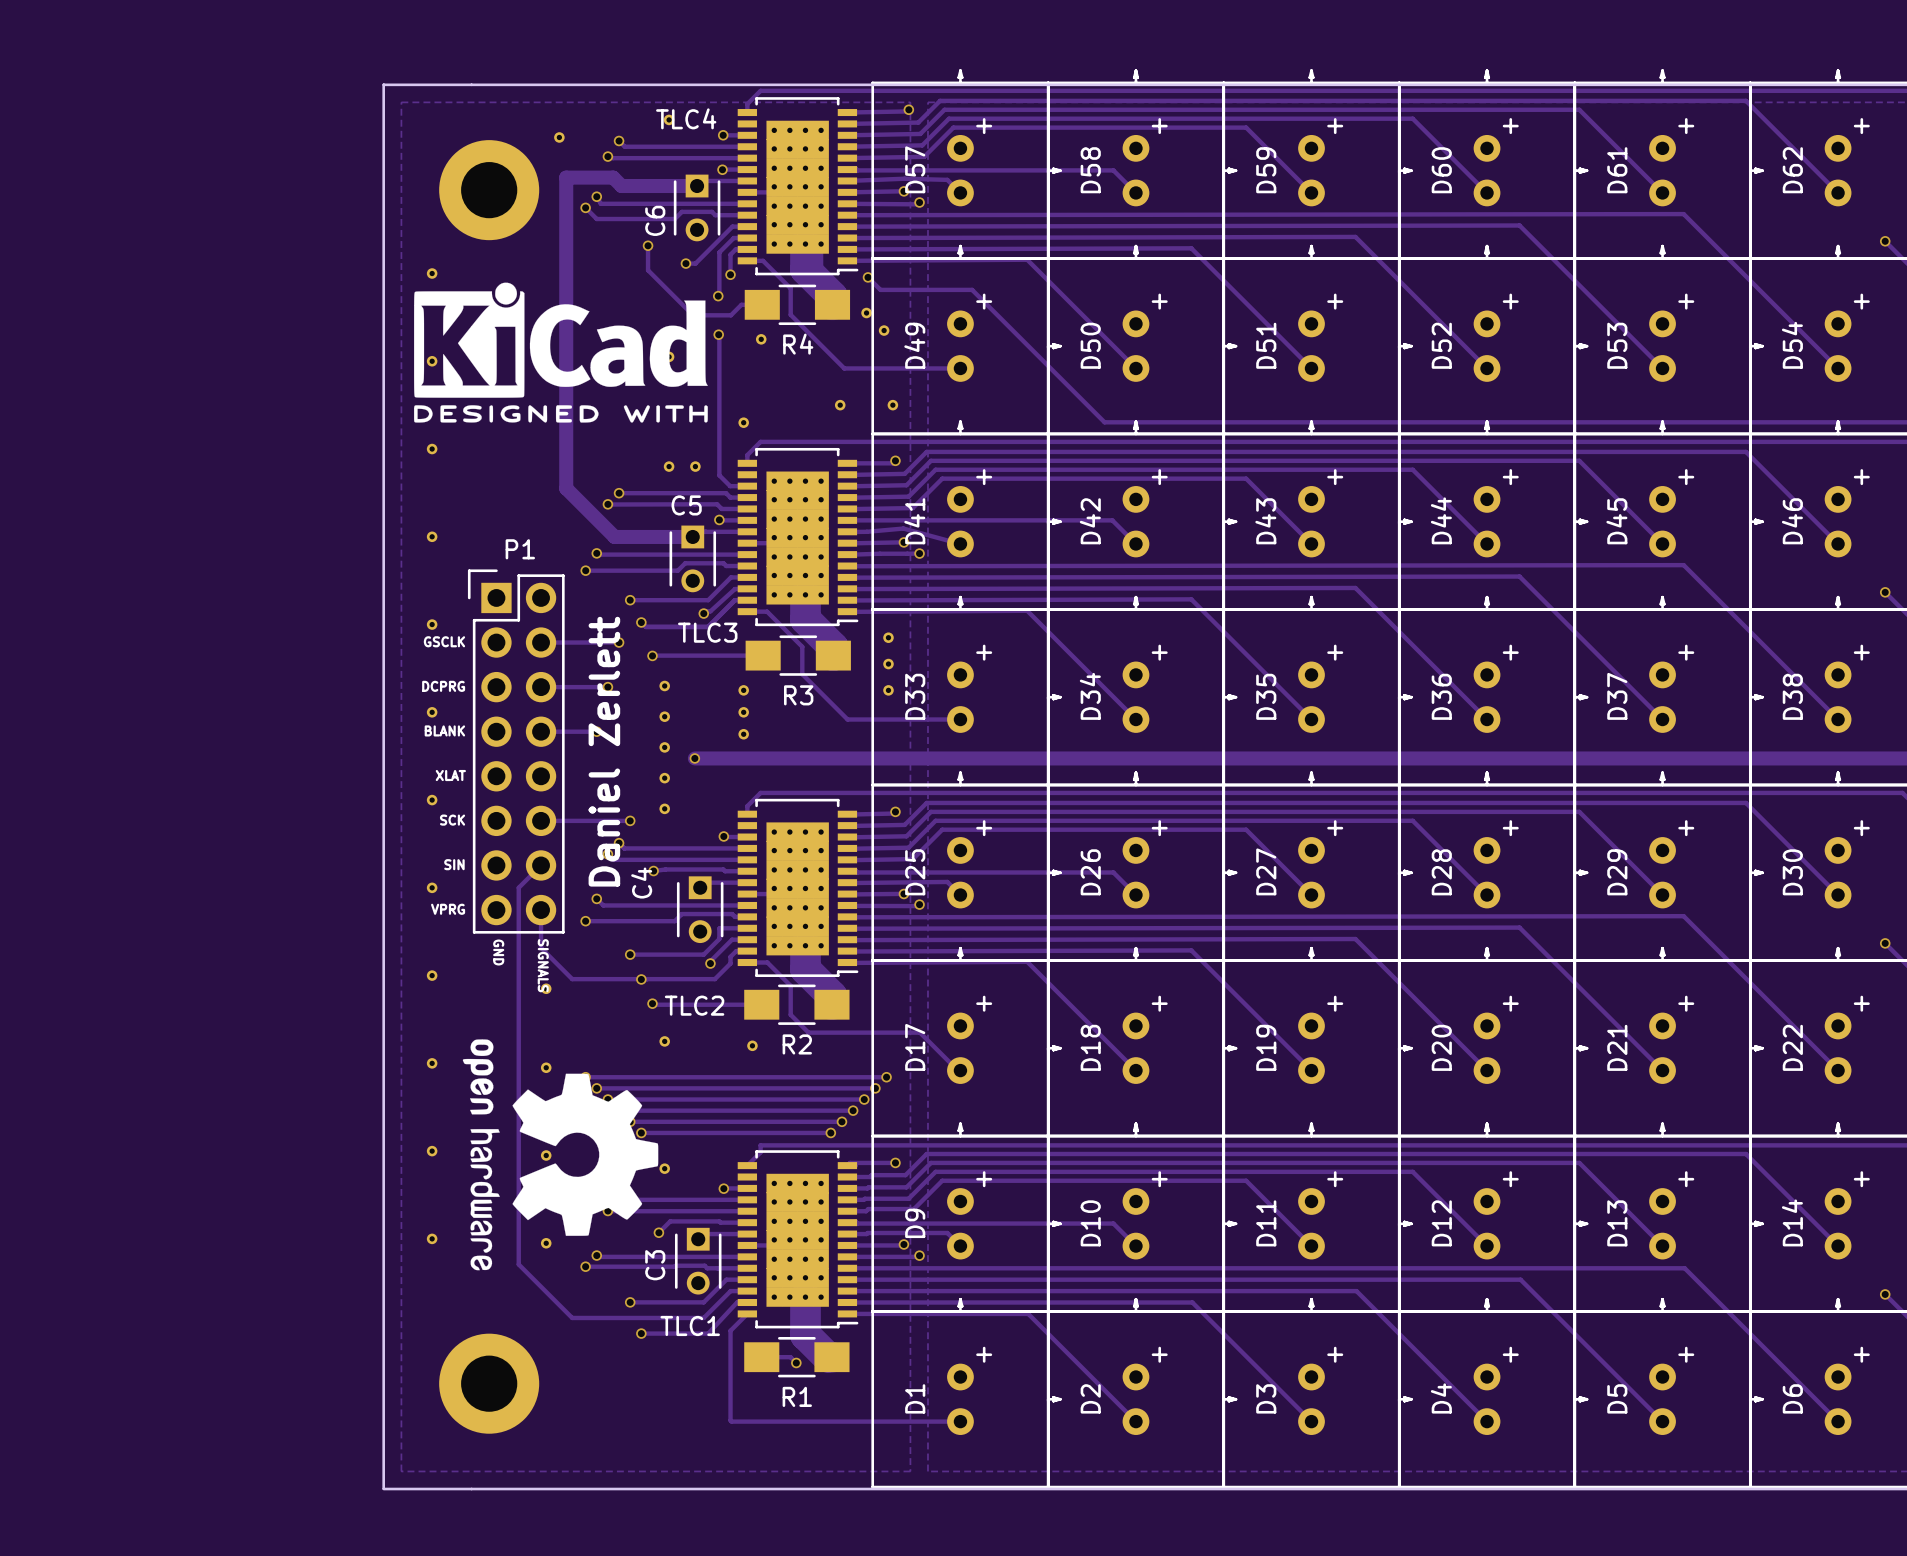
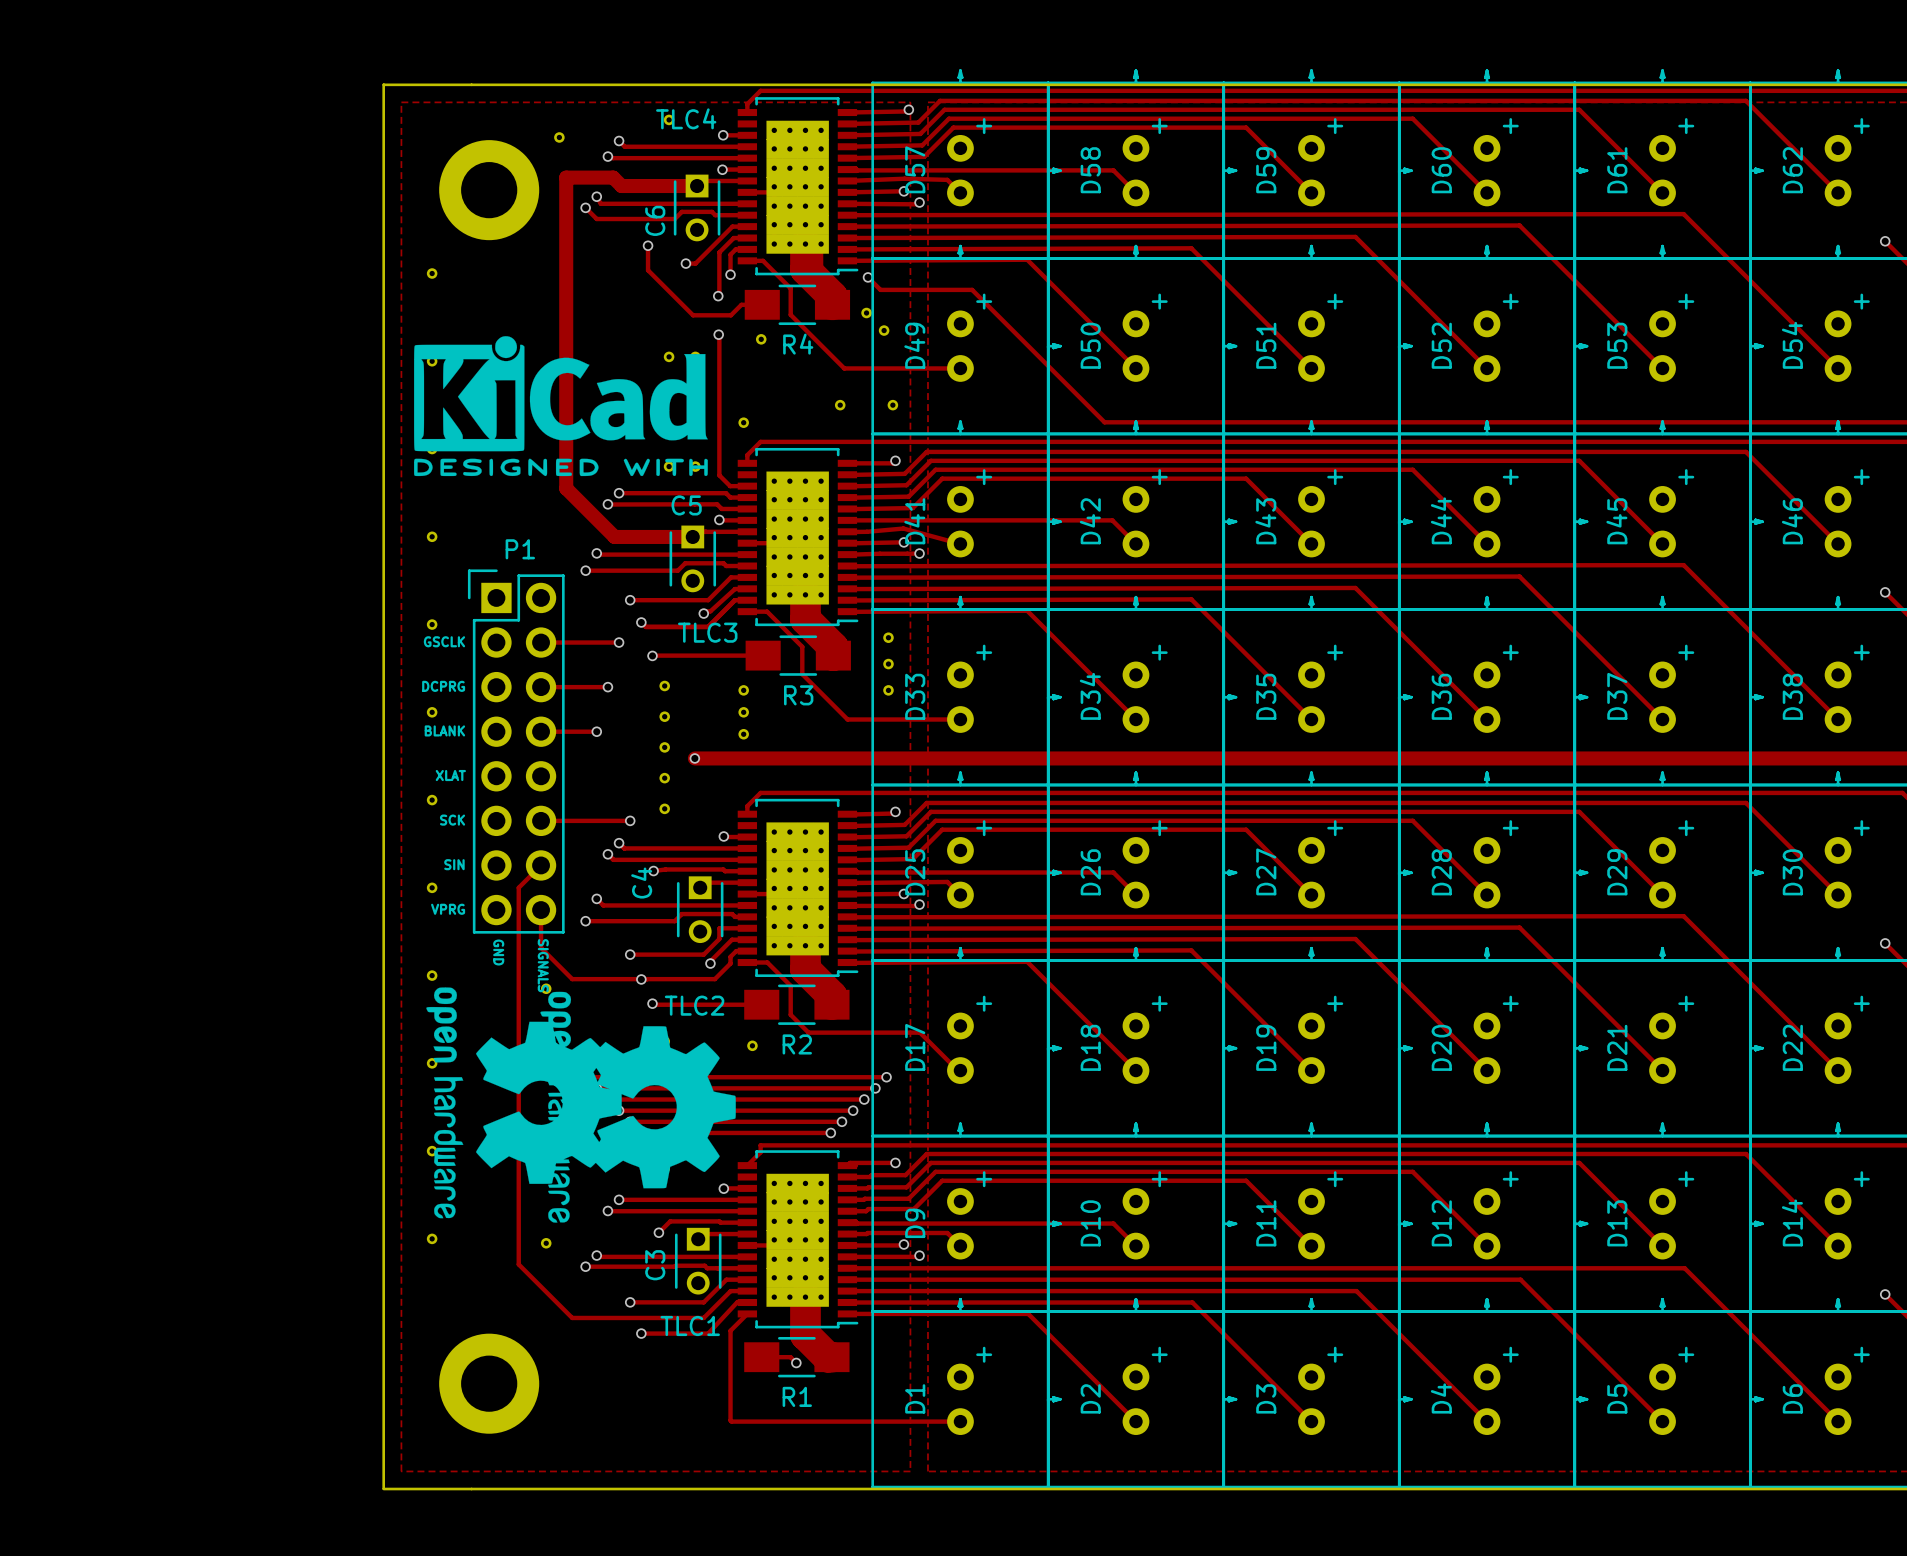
drawing position: (560, 352) -> (560, 406)
text: Daniel Zerlett (604, 751) -> none
drawing: none -> [426, 987, 736, 1223]
drawing: [462, 1039, 659, 1271] -> none

